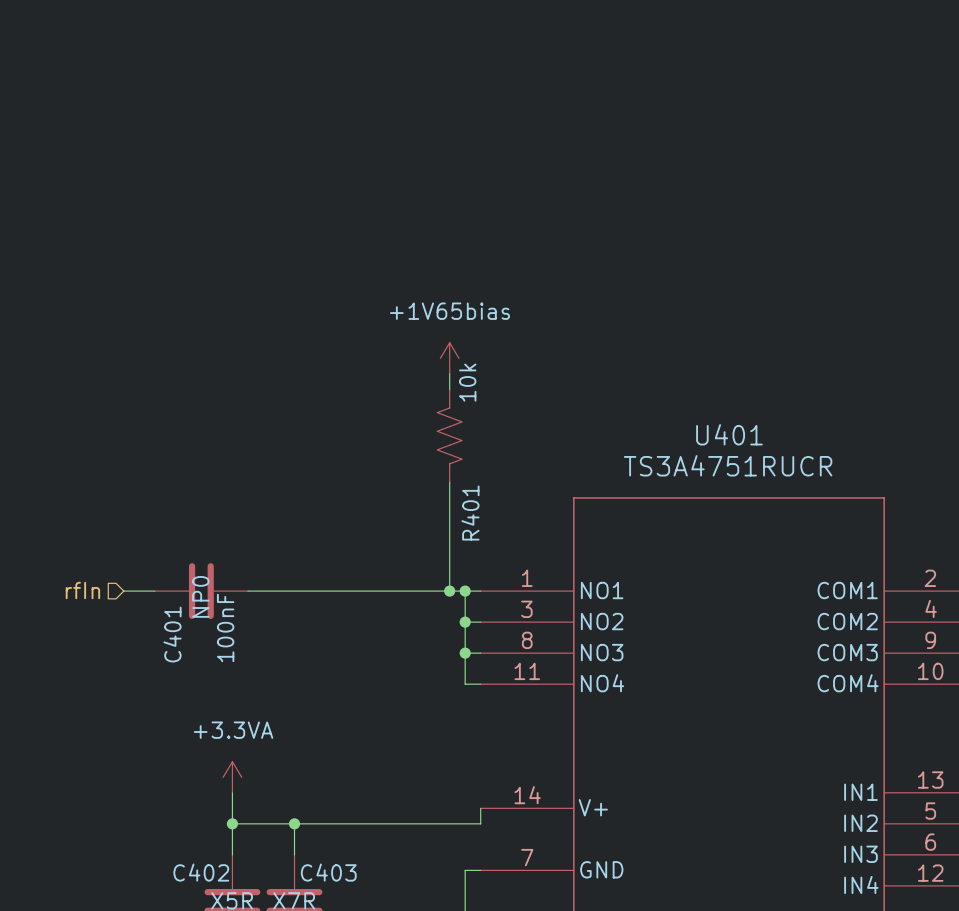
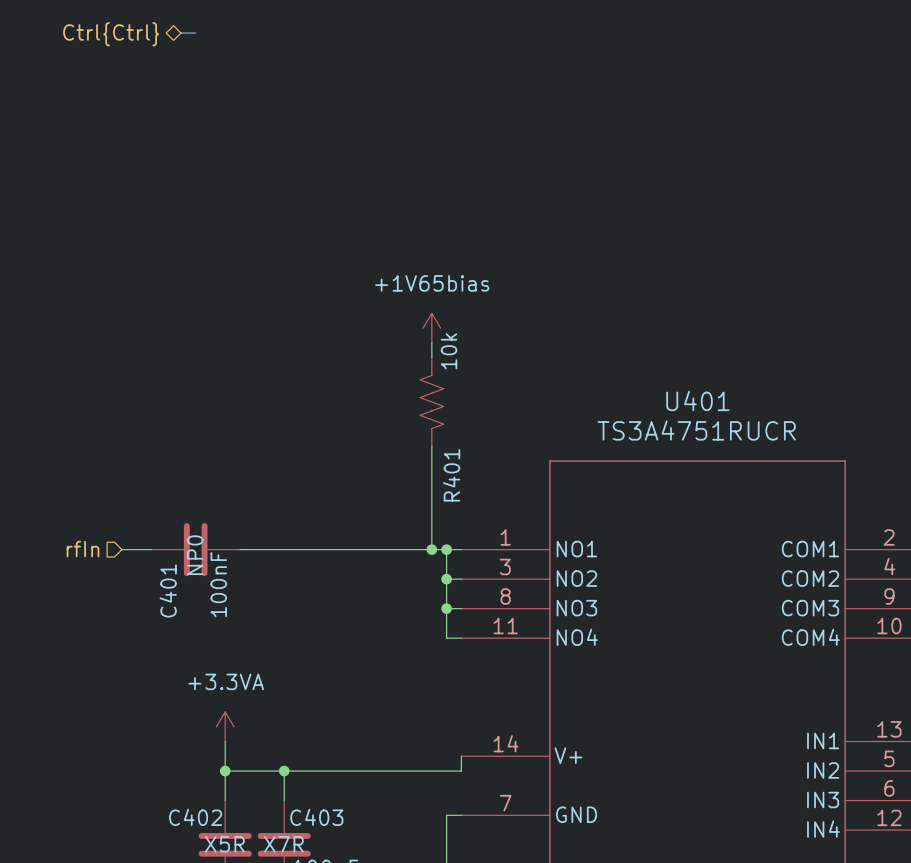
bus: none -> (180, 33) (195, 33)
hierarchical label: none -> Ctrl{Ctrl} (111, 34)

